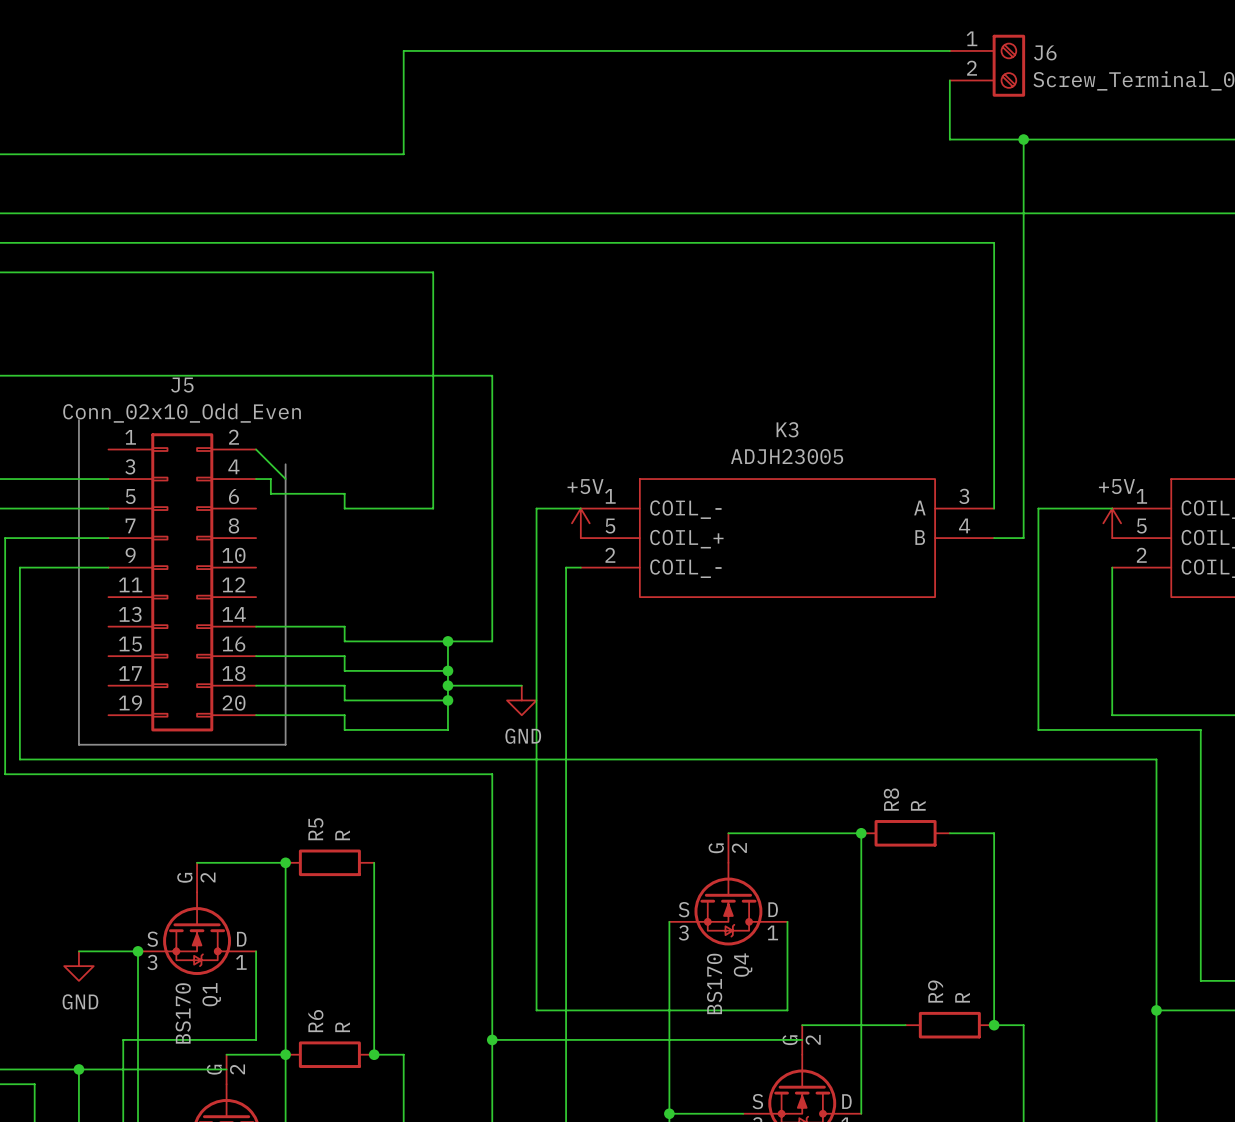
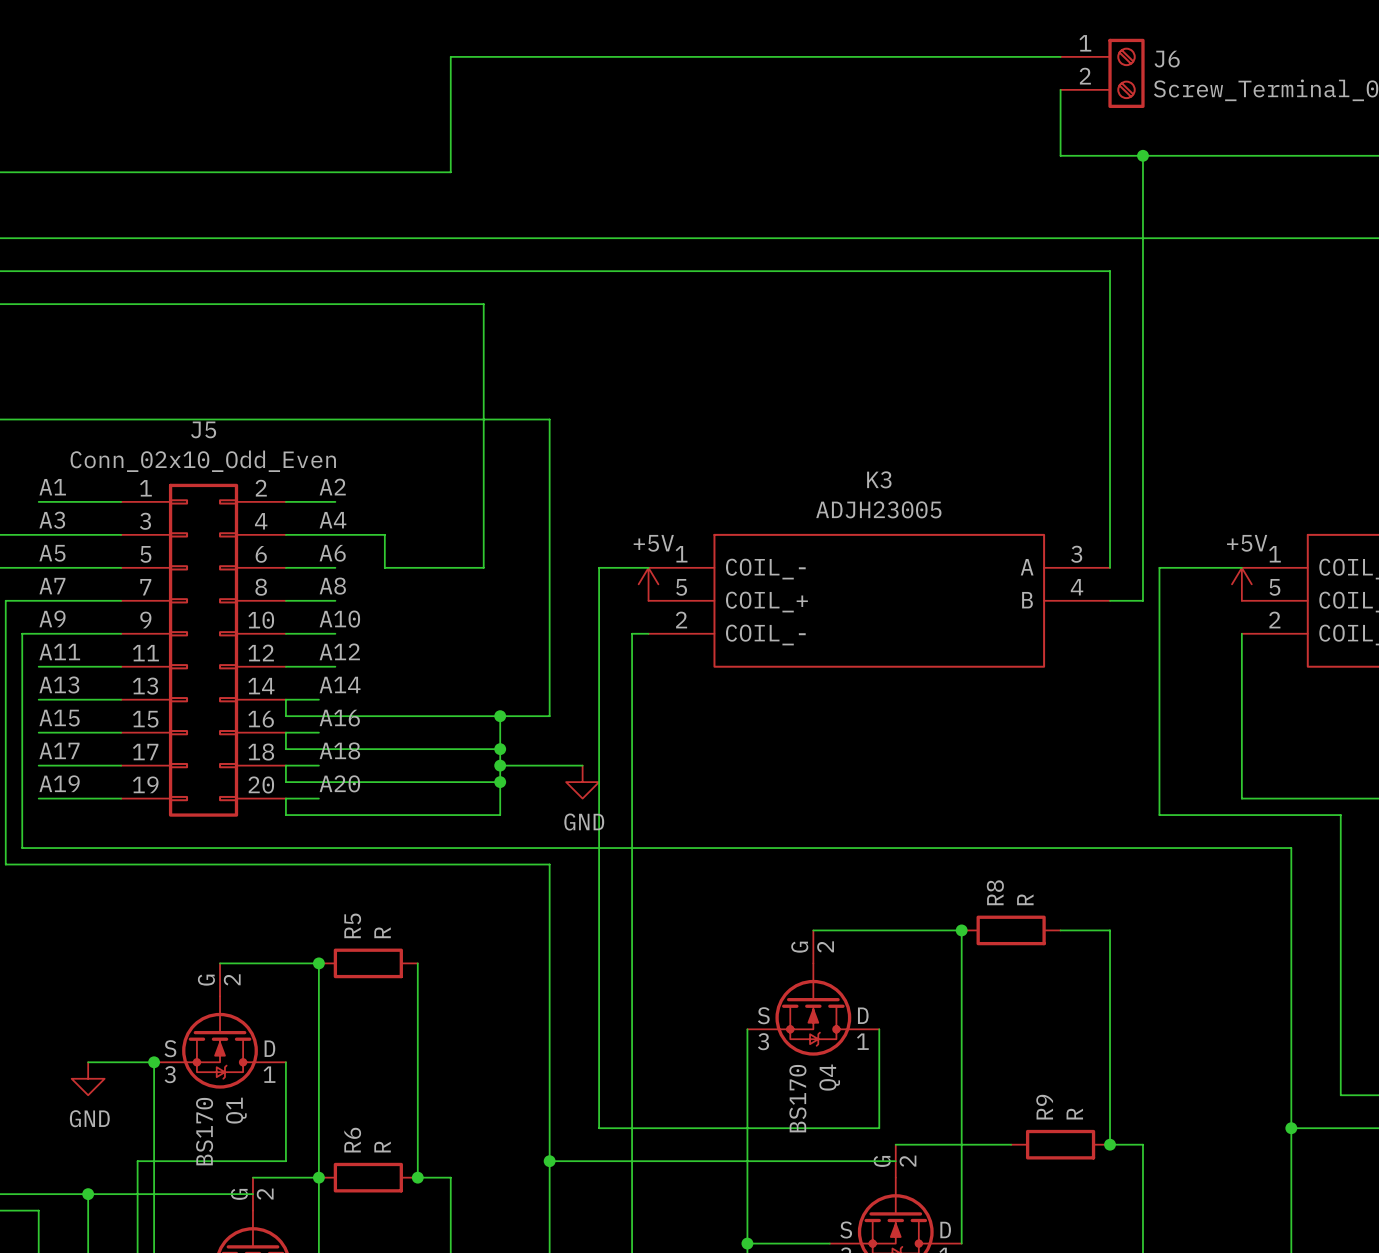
bus: (78, 419) (78, 744) (285, 744) (285, 464) -> none
label: none -> A1 (52, 487)
label: none -> A2 (332, 487)
wire: none -> (38, 501) (121, 501)
wire: (256, 449) (285, 479) -> (285, 501) (335, 501)
label: none -> A3 (52, 520)
label: none -> A4 (332, 520)
wire: (270, 479) (270, 493) (344, 493) -> (302, 534) (384, 534) (384, 551)
label: none -> A5 (52, 553)
label: none -> A6 (332, 553)
wire: none -> (285, 567) (335, 567)
label: none -> A7 (52, 586)
label: none -> A8 (332, 586)
wire: none -> (285, 600) (335, 600)
label: none -> A9 (52, 618)
label: none -> A10 (339, 619)
wire: none -> (285, 633) (335, 633)
label: none -> A11 (59, 652)
label: none -> A12 (339, 651)
wire: none -> (38, 666) (121, 666)
wire: none -> (285, 666) (335, 666)
label: none -> A13 (59, 684)
label: none -> A14 (340, 684)
wire: none -> (38, 699) (121, 699)
wire: (285, 626) (344, 626) (344, 641) -> (285, 699) (285, 716) (384, 716)
label: none -> A15 (59, 718)
label: none -> A16 (339, 718)
wire: none -> (38, 732) (121, 732)
wire: (285, 656) (344, 656) (344, 670) -> (285, 732) (285, 749) (384, 749)
label: none -> A17 (59, 750)
label: none -> A18 (339, 750)
wire: none -> (38, 765) (121, 765)
wire: (285, 685) (344, 685) (344, 700) -> (285, 765) (285, 782) (384, 782)
label: none -> A19 (59, 783)
label: none -> A20 (339, 783)
wire: none -> (38, 798) (121, 798)
wire: (285, 715) (344, 715) (344, 729) -> (285, 798) (285, 815) (384, 815)

